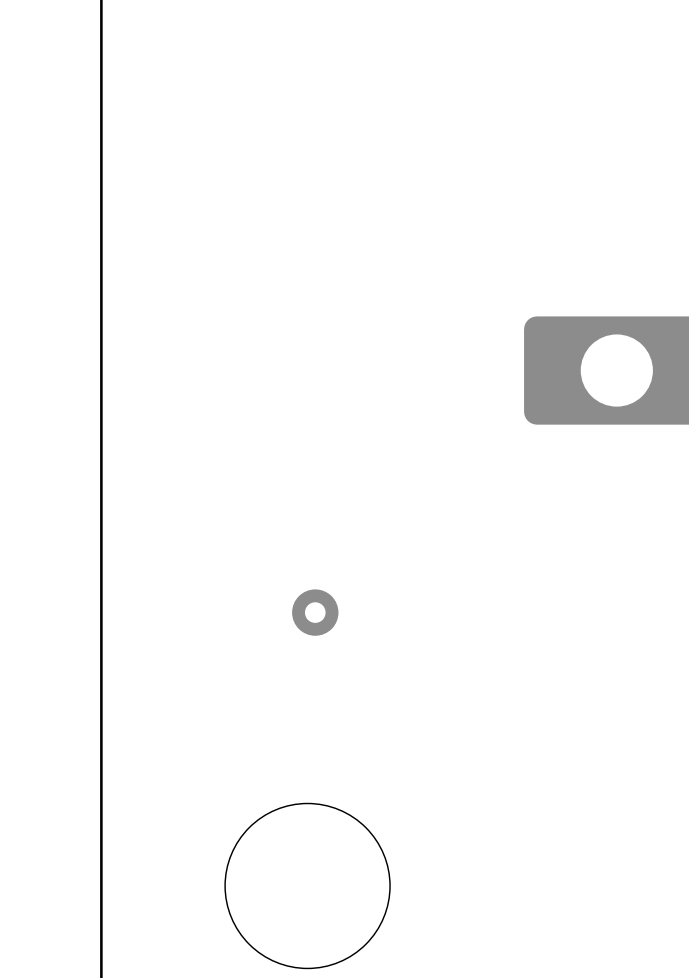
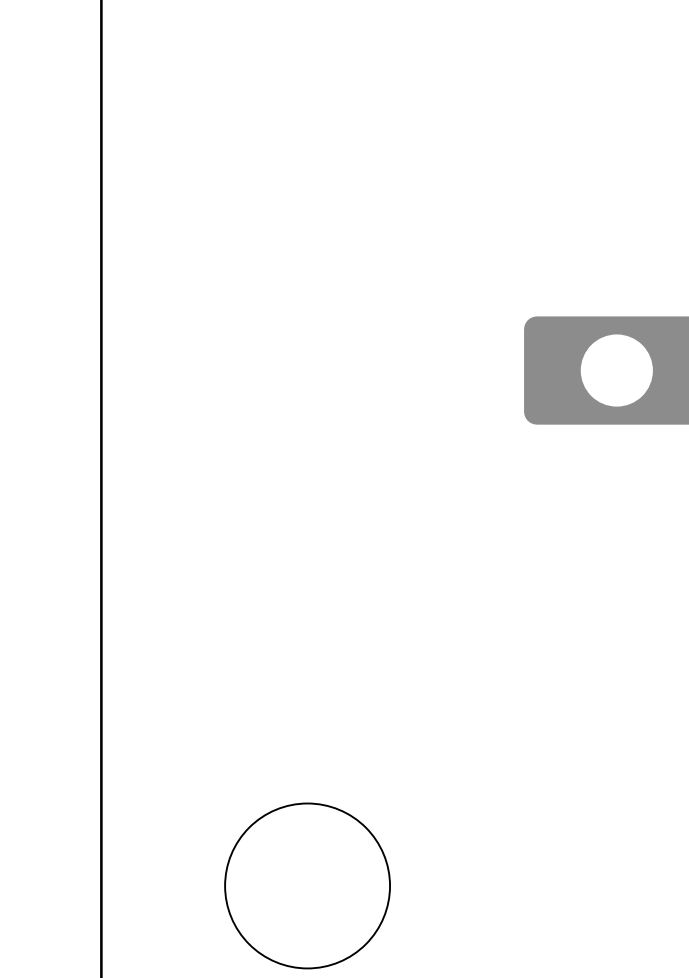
via: (315, 612) -> none

